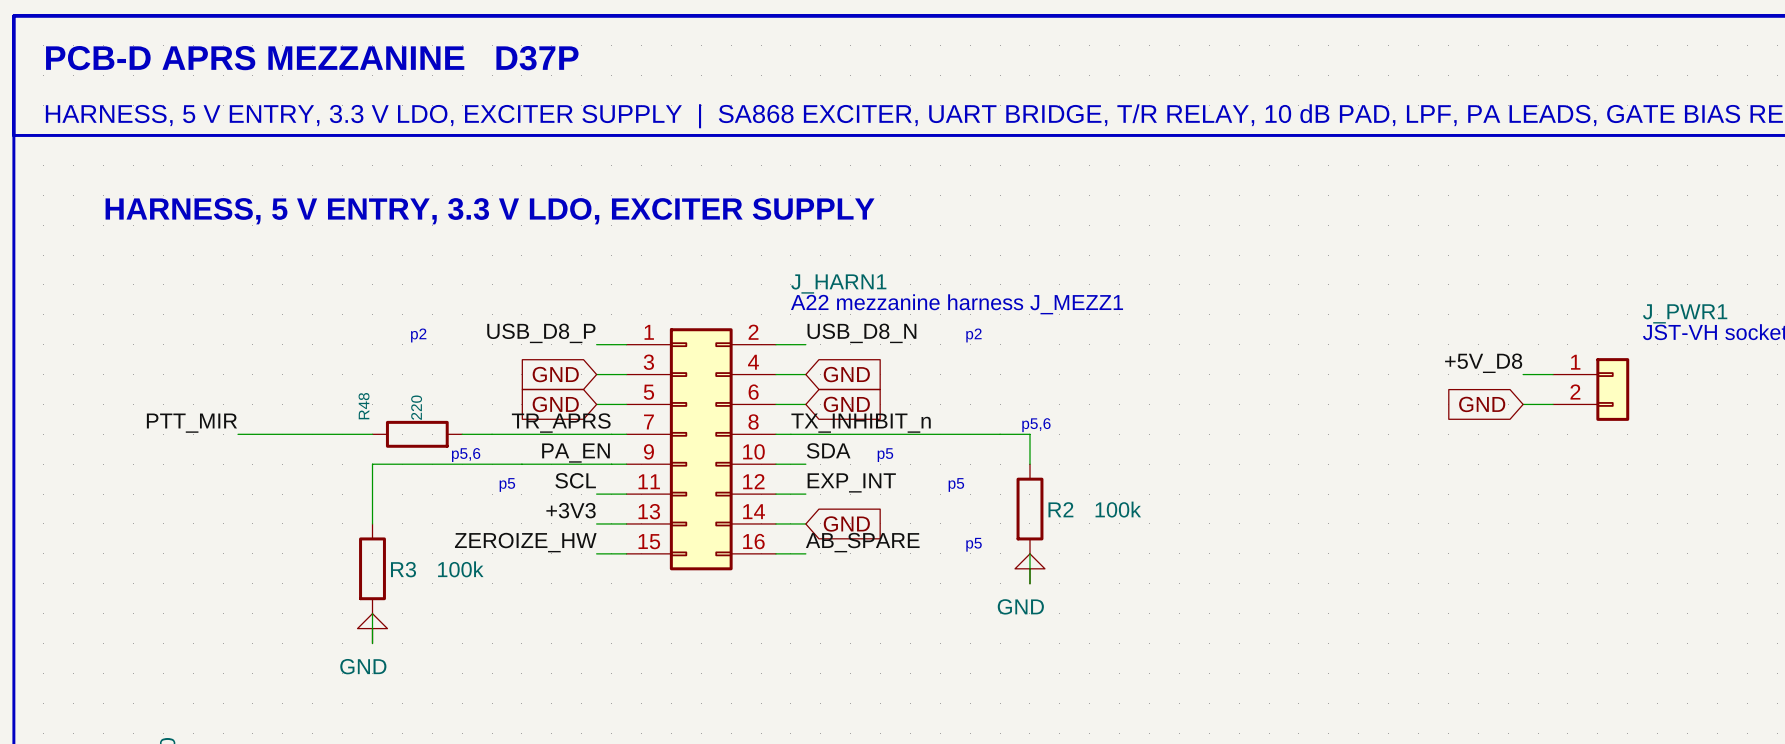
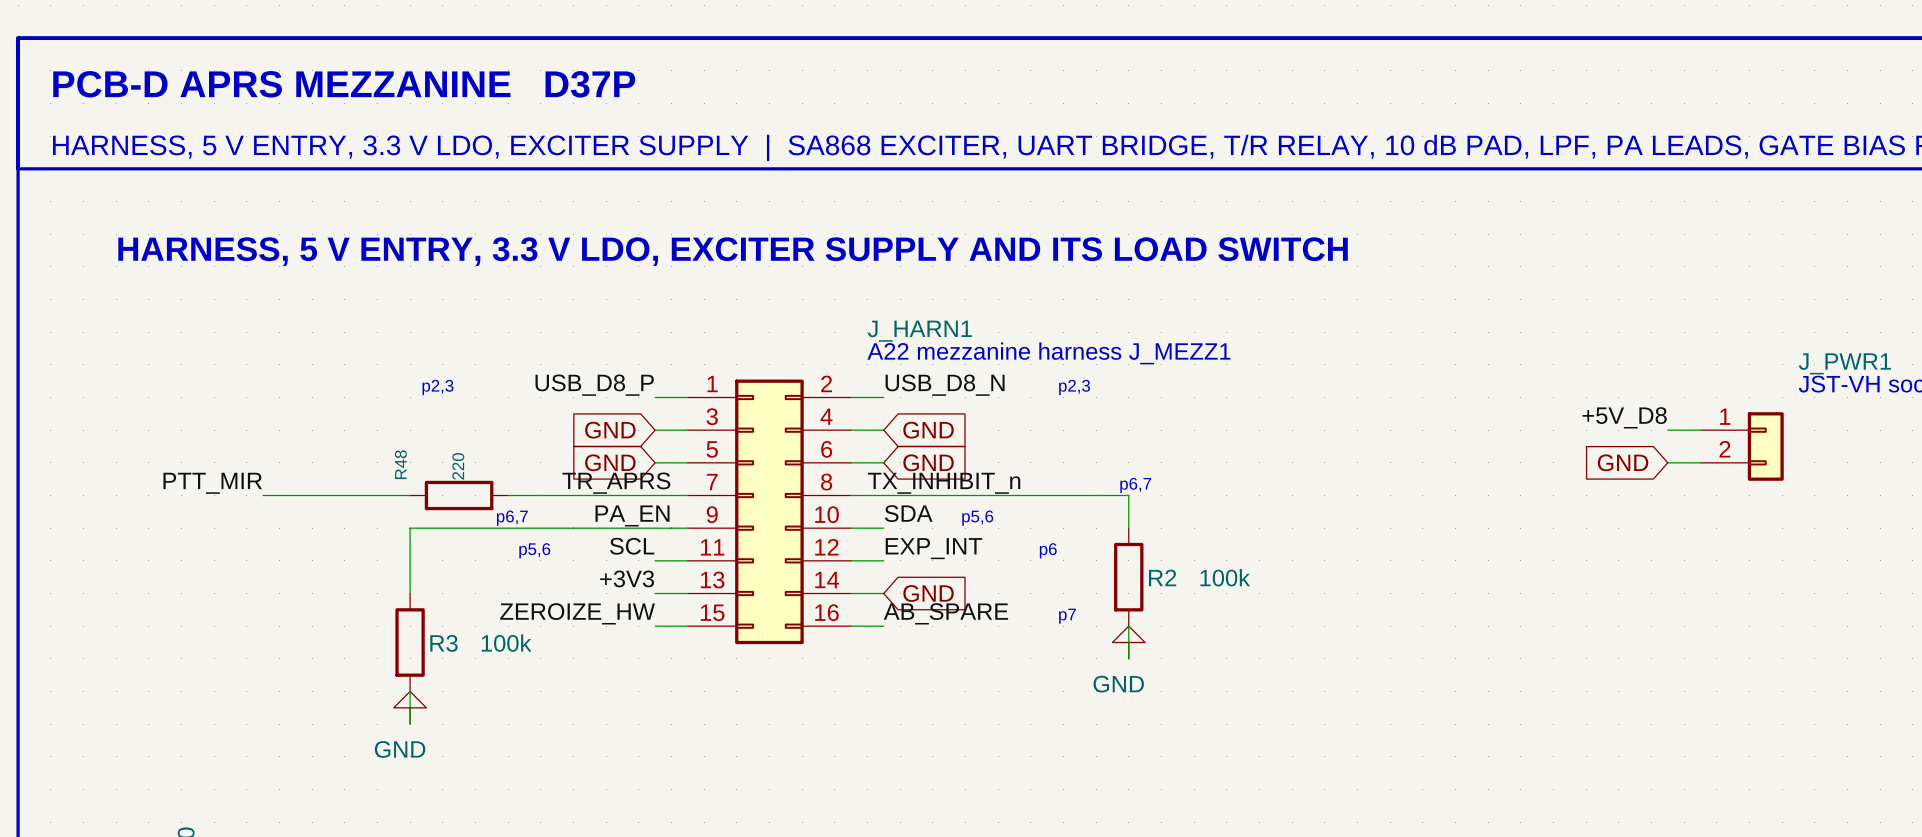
text: HARNESS, 5 V ENTRY, 3.3 V LDO, EXCITER SUPPLY (490, 211) -> HARNESS, 5 V ENTRY, 3.3 V LDO, EXCITER SUPPLY AND ITS LOAD SWITCH (733, 251)
text: p2 (418, 335) -> p2,3 (437, 387)
text: p2 (973, 335) -> p2,3 (1074, 387)
text: p5,6 (1036, 425) -> p6,7 (1135, 485)
text: p5,6 (466, 455) -> p6,7 (512, 518)
text: p5 (885, 455) -> p5,6 (977, 518)
text: p5 (507, 484) -> p5,6 (534, 550)
text: p5 (956, 484) -> p6 (1048, 550)
text: p5 (974, 544) -> p7 (1067, 616)

